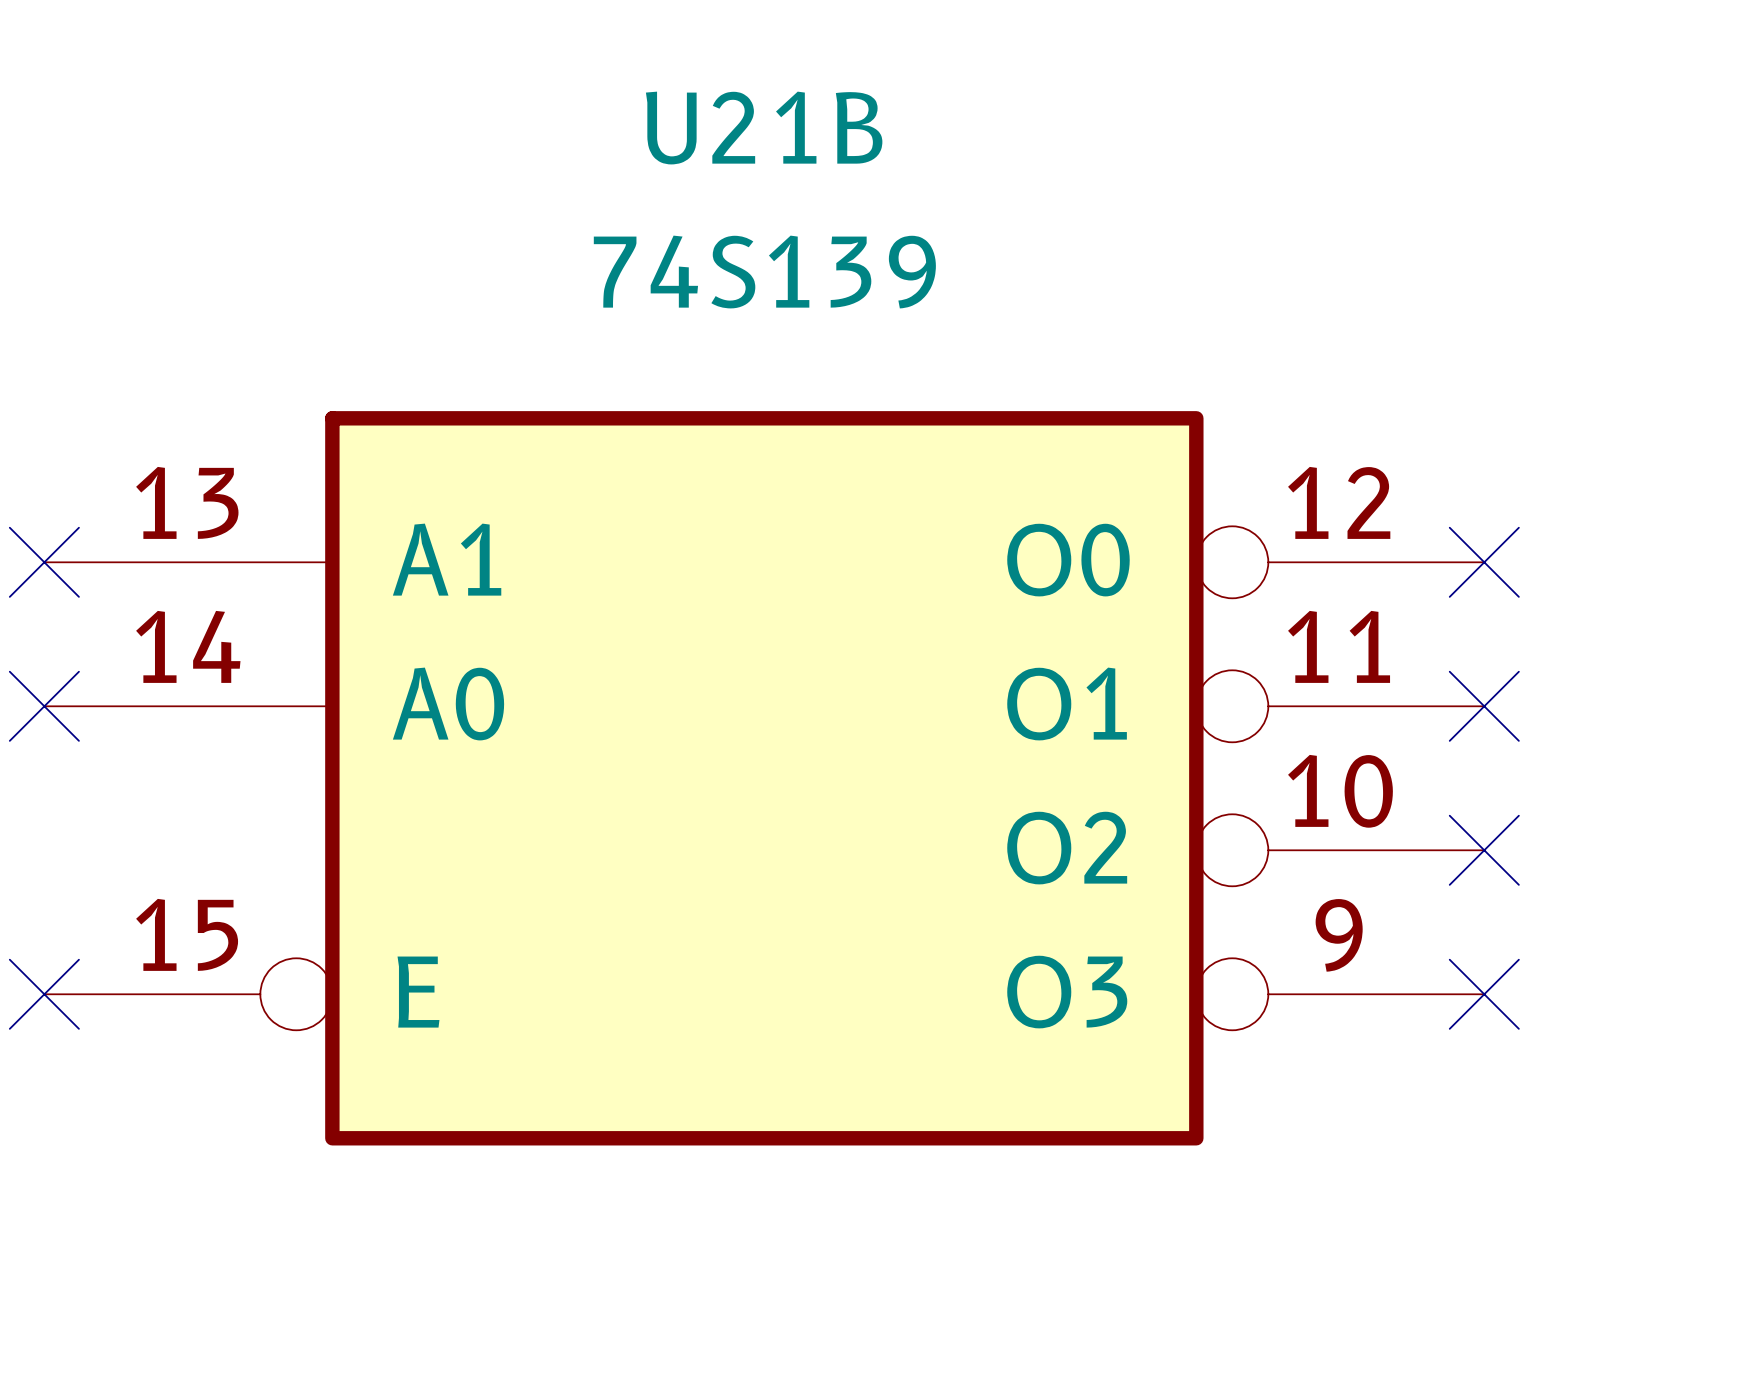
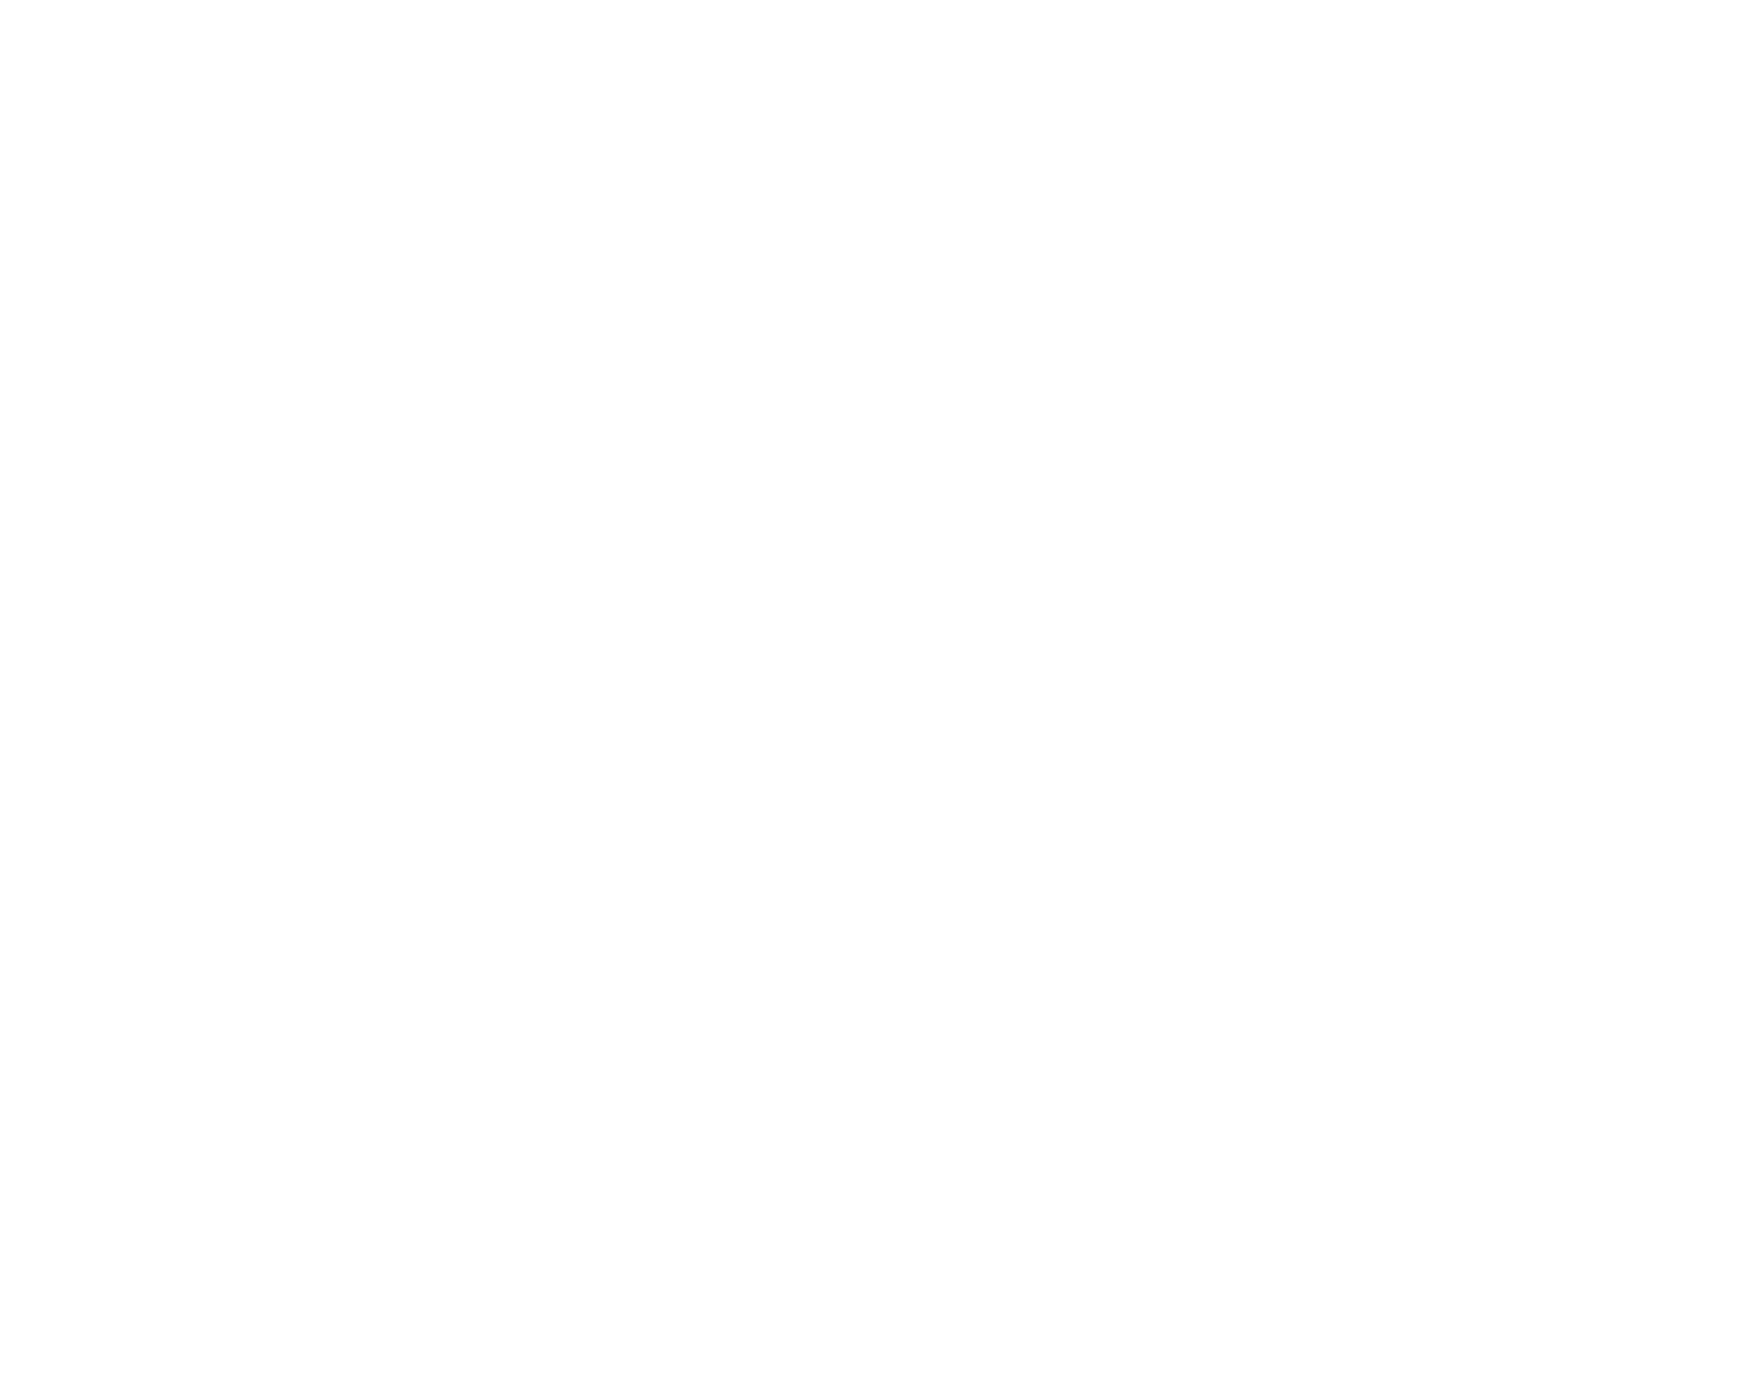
no-connect mark: (44, 562) -> none
no-connect mark: (1484, 562) -> none
no-connect mark: (44, 706) -> none
no-connect mark: (1484, 706) -> none
U21B: 74S139 (764, 778) -> none
no-connect mark: (1484, 850) -> none
no-connect mark: (44, 994) -> none
no-connect mark: (1484, 994) -> none

